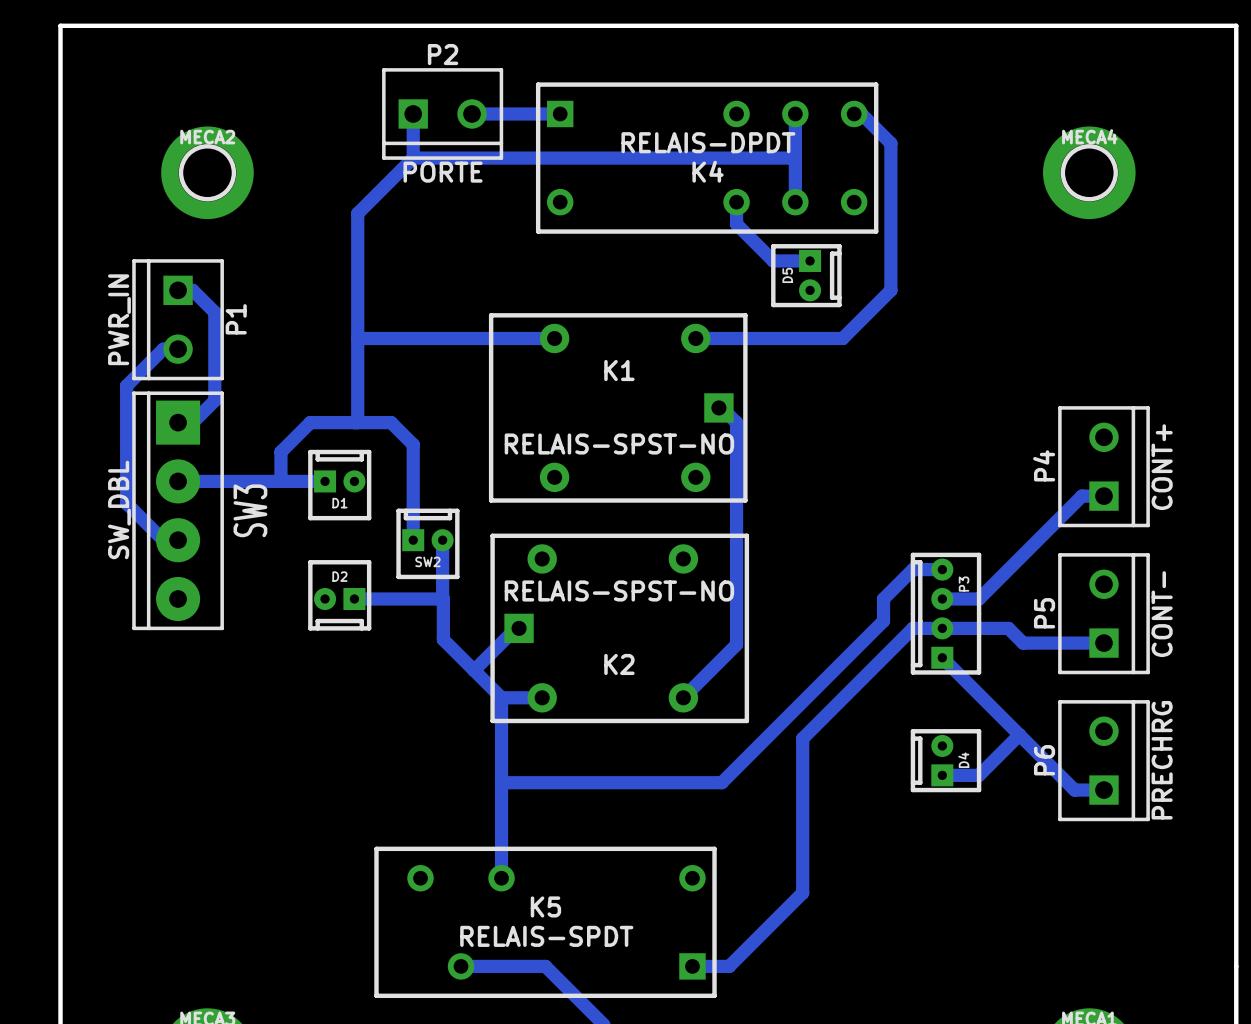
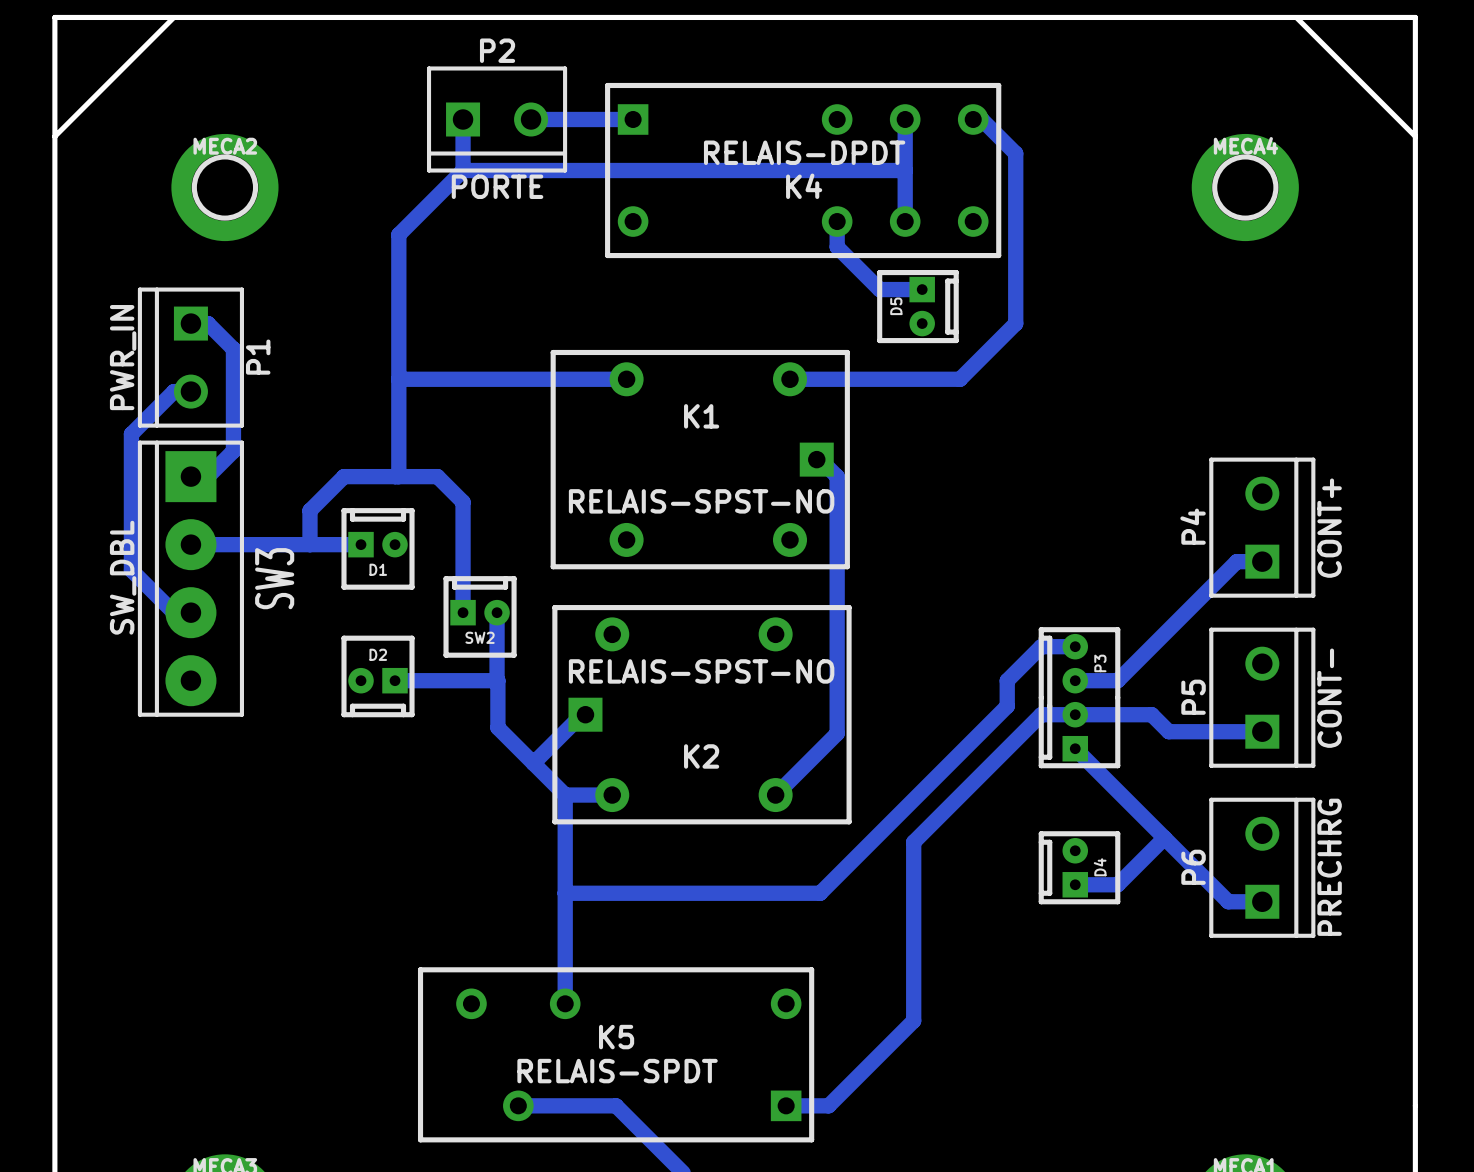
board edge: none -> (173, 17) (54, 136)
board edge: none -> (1296, 17) (1415, 136)

